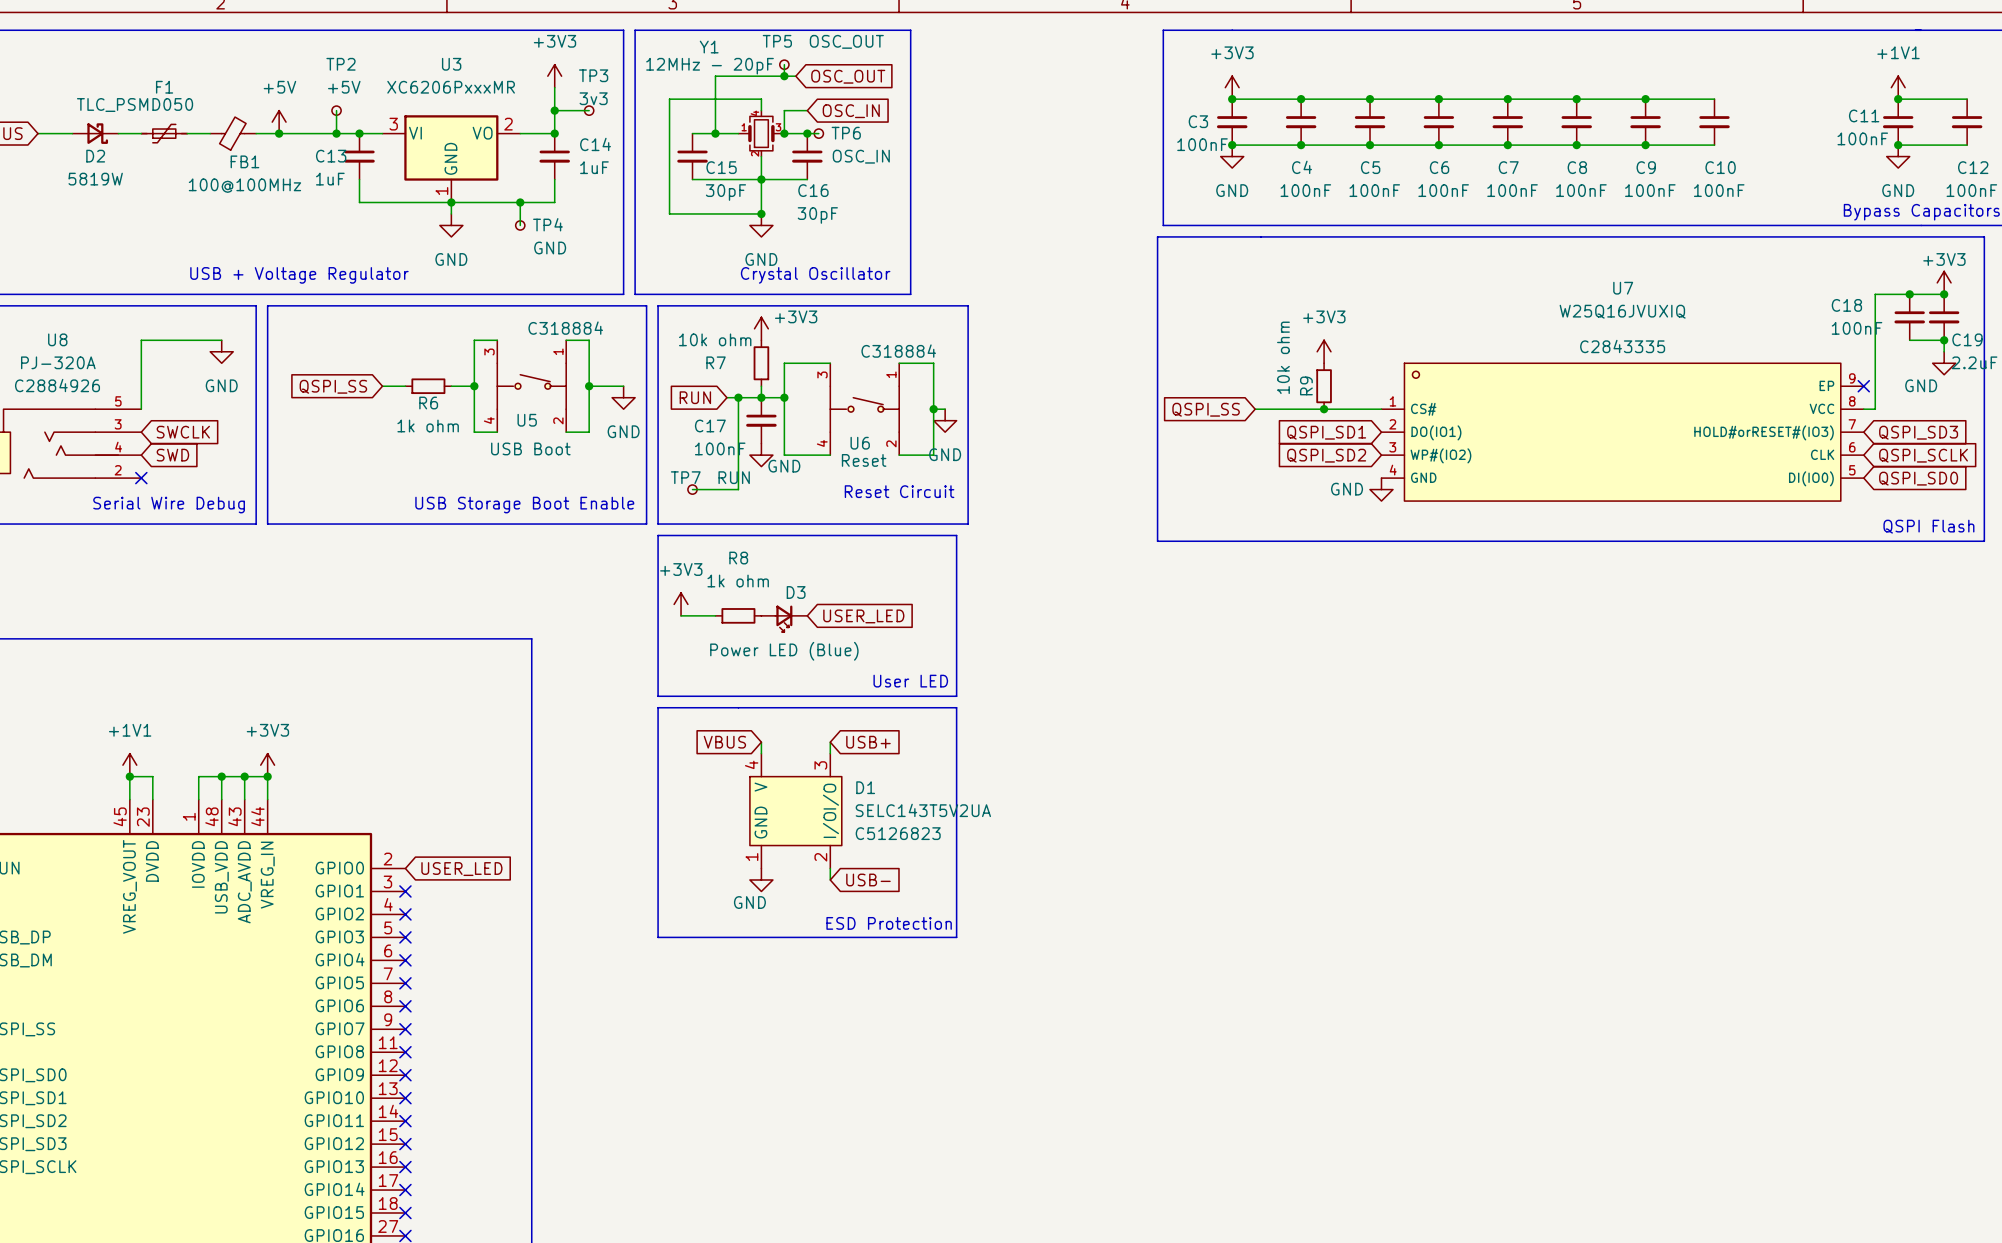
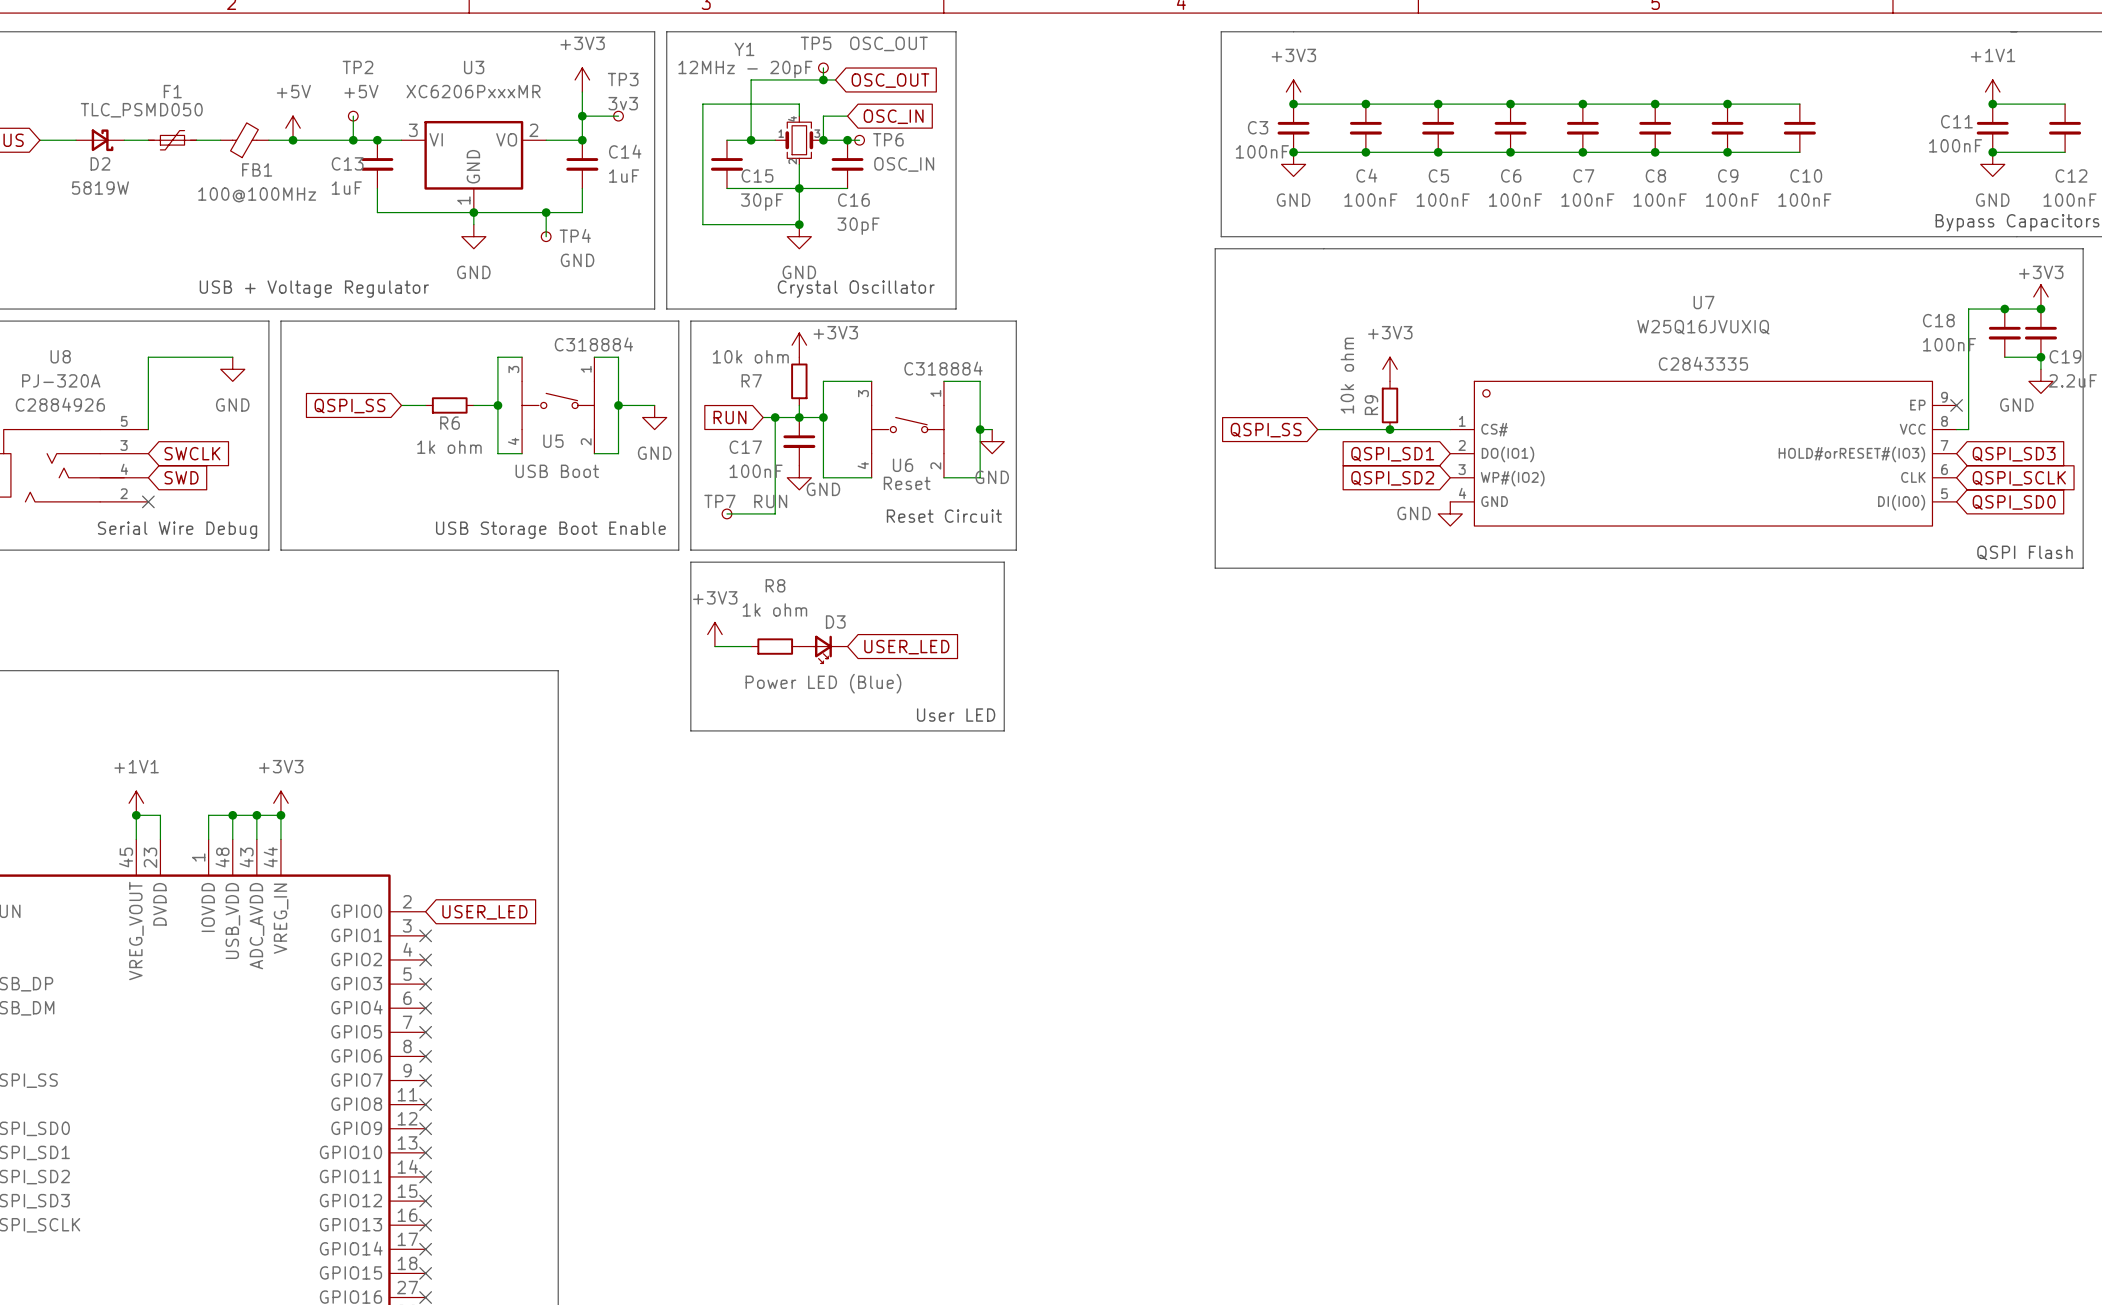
line: (658, 707) (956, 707) (956, 937) (658, 937) (658, 707) -> none
global label: VBUS (724, 742) -> none
wire: (761, 742) (761, 753) -> none
wire: (830, 742) (830, 753) -> none
global label: USB+ (868, 742) -> none
D1: SELC143T5V2UA (795, 811) -> none
wire: (830, 868) (830, 879) -> none
power symbol: GND (761, 879) -> none
global label: USB- (868, 879) -> none
text: ESD Protection (889, 923) -> none

